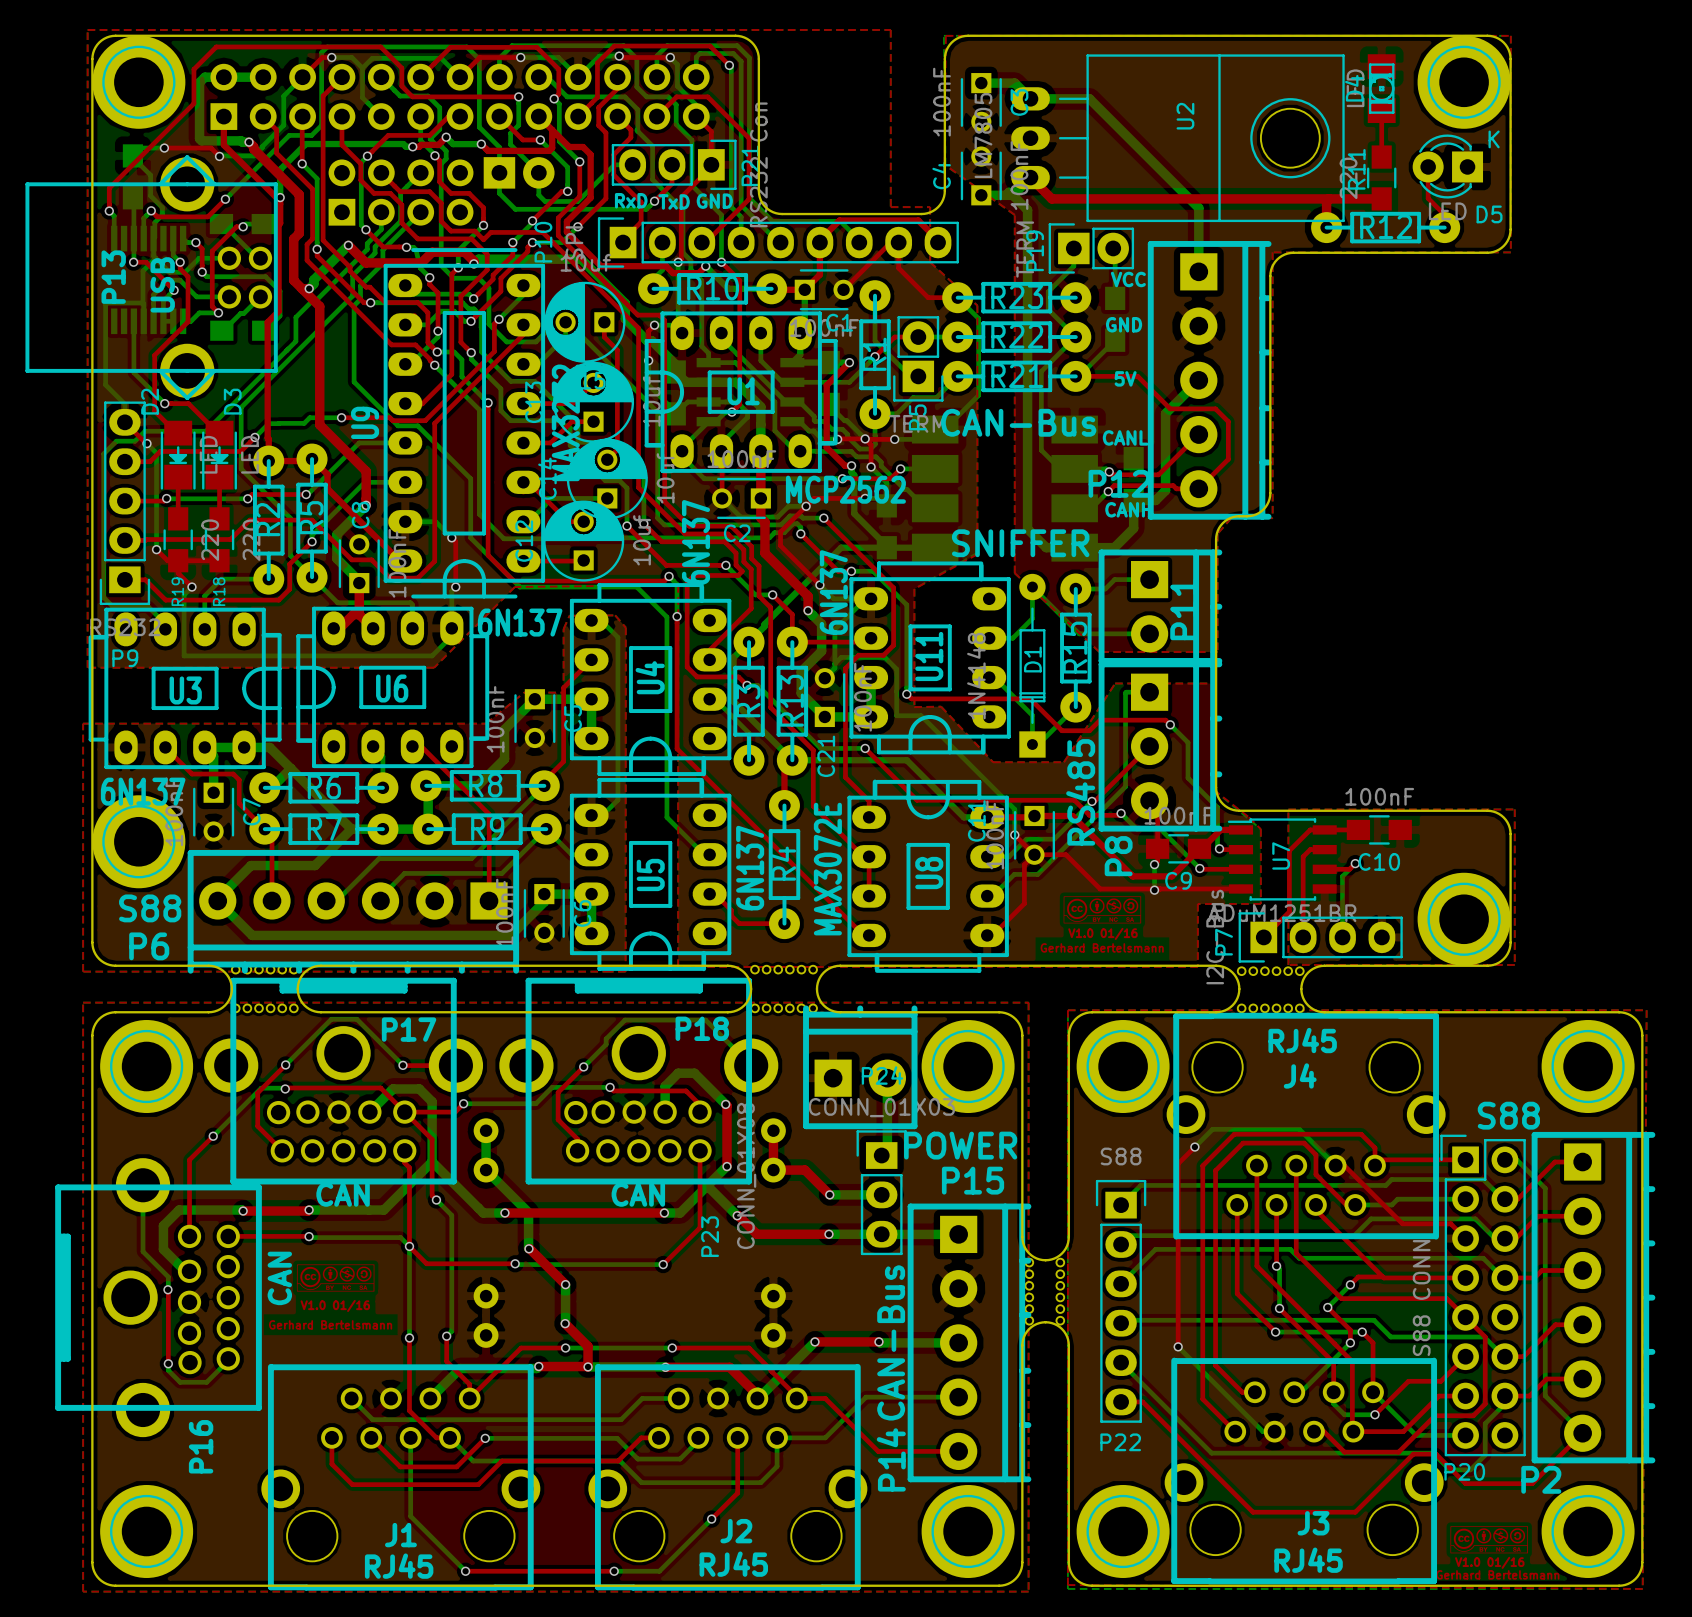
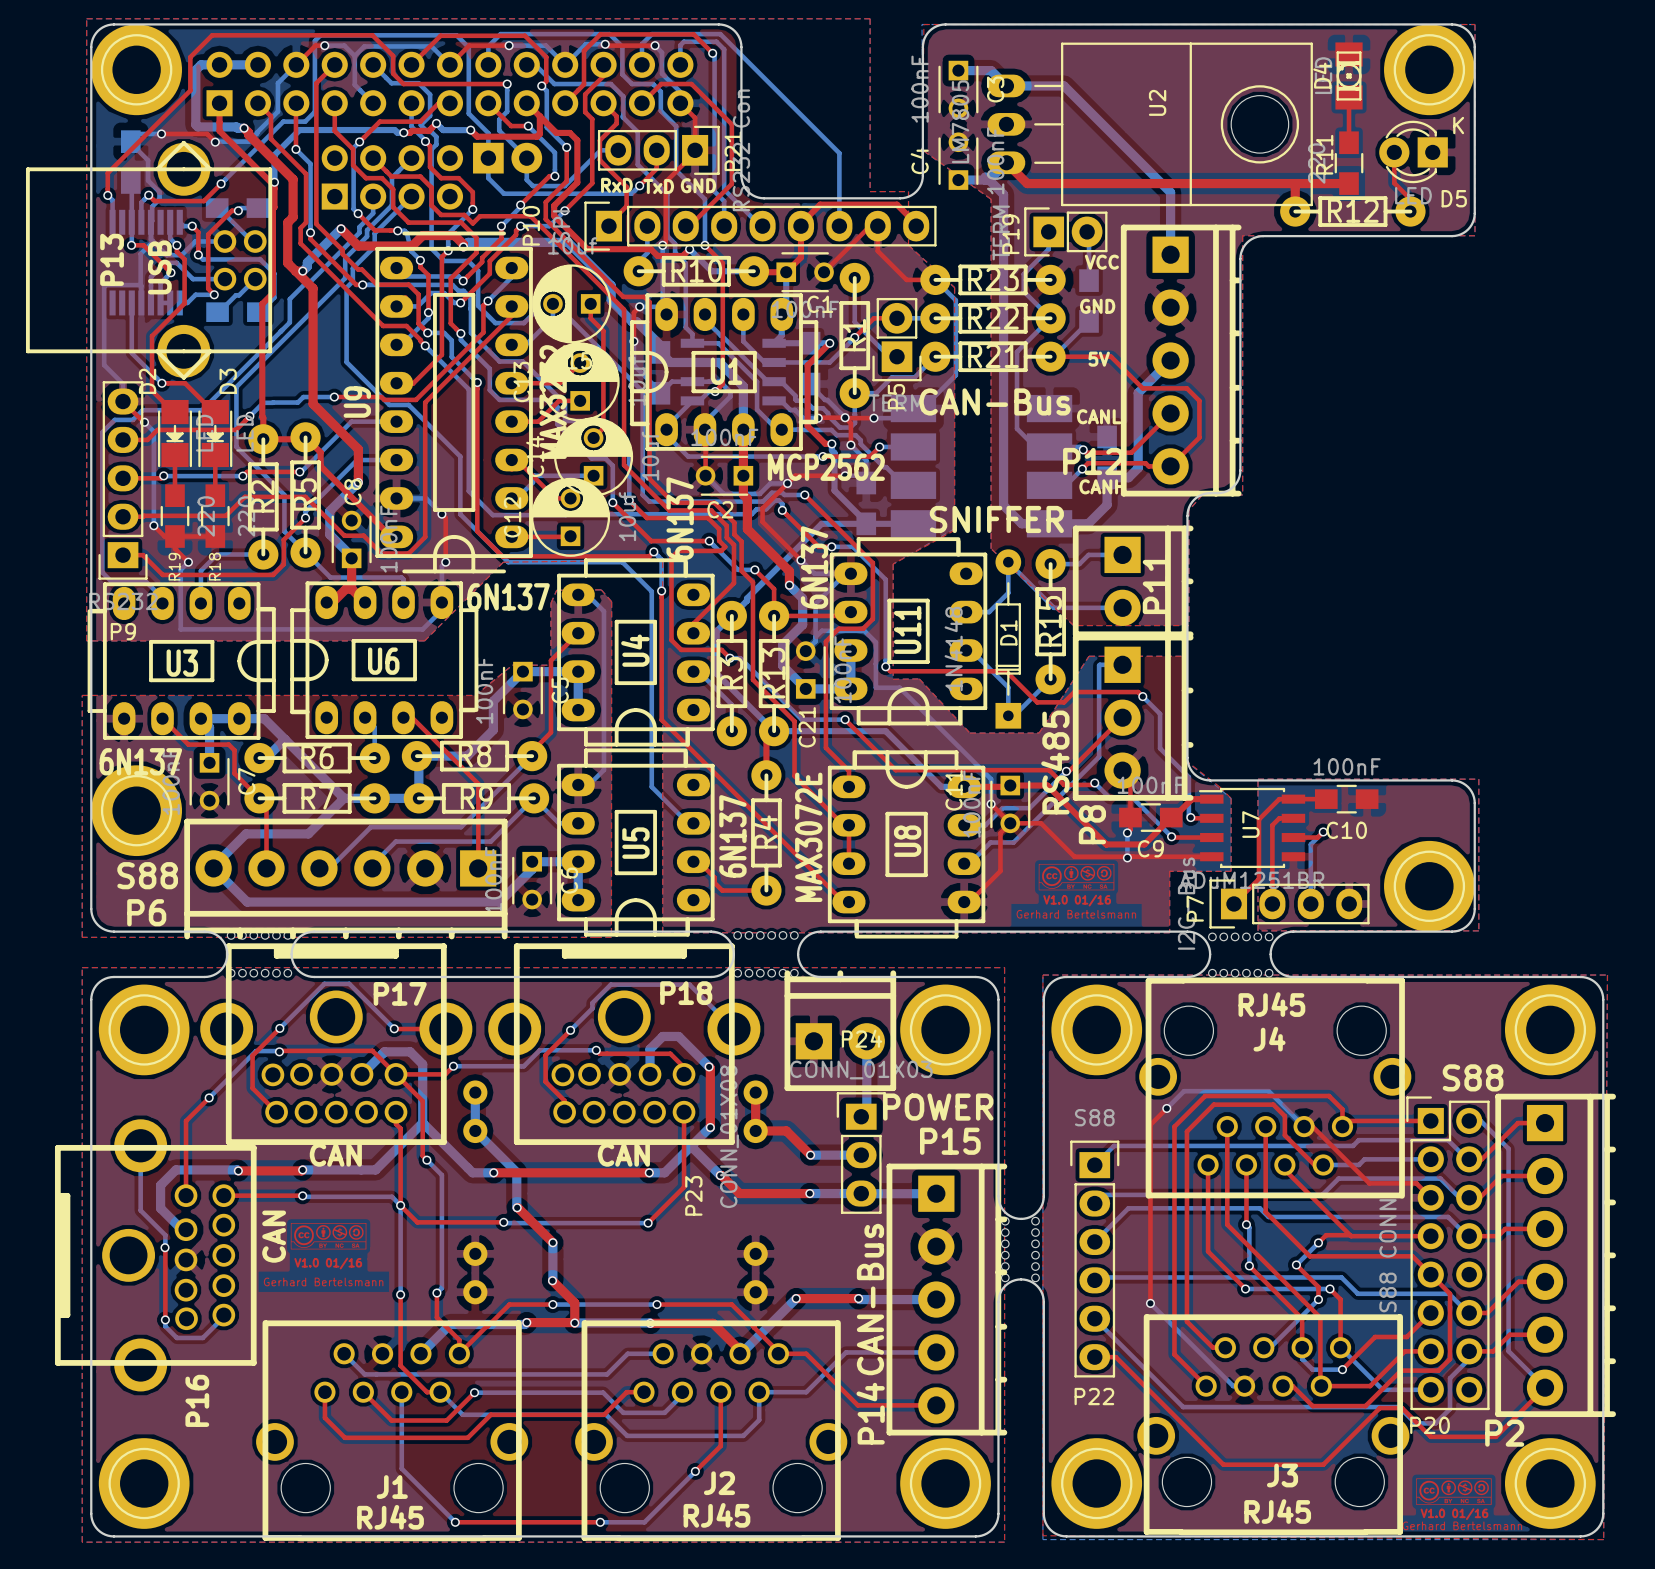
bottom track: (749, 57) (749, 198) (772, 221) (840, 221) (859, 240) -> (732, 46) (839, 153) (839, 223)

